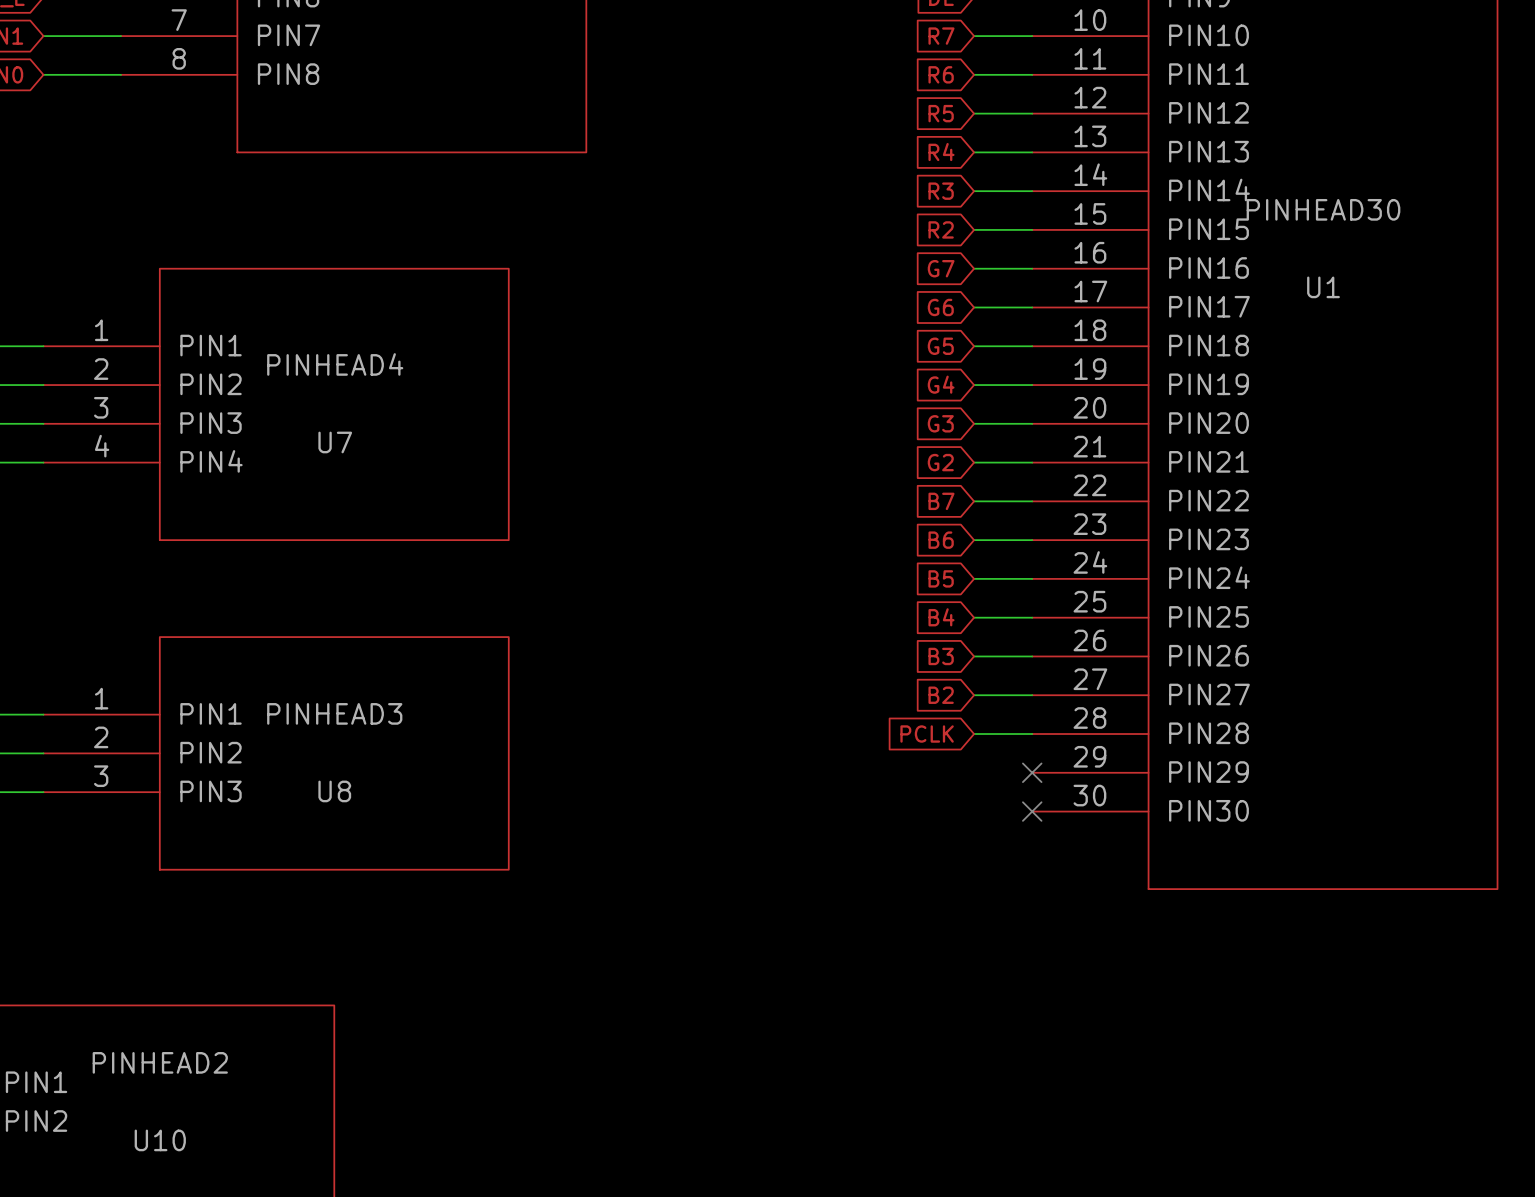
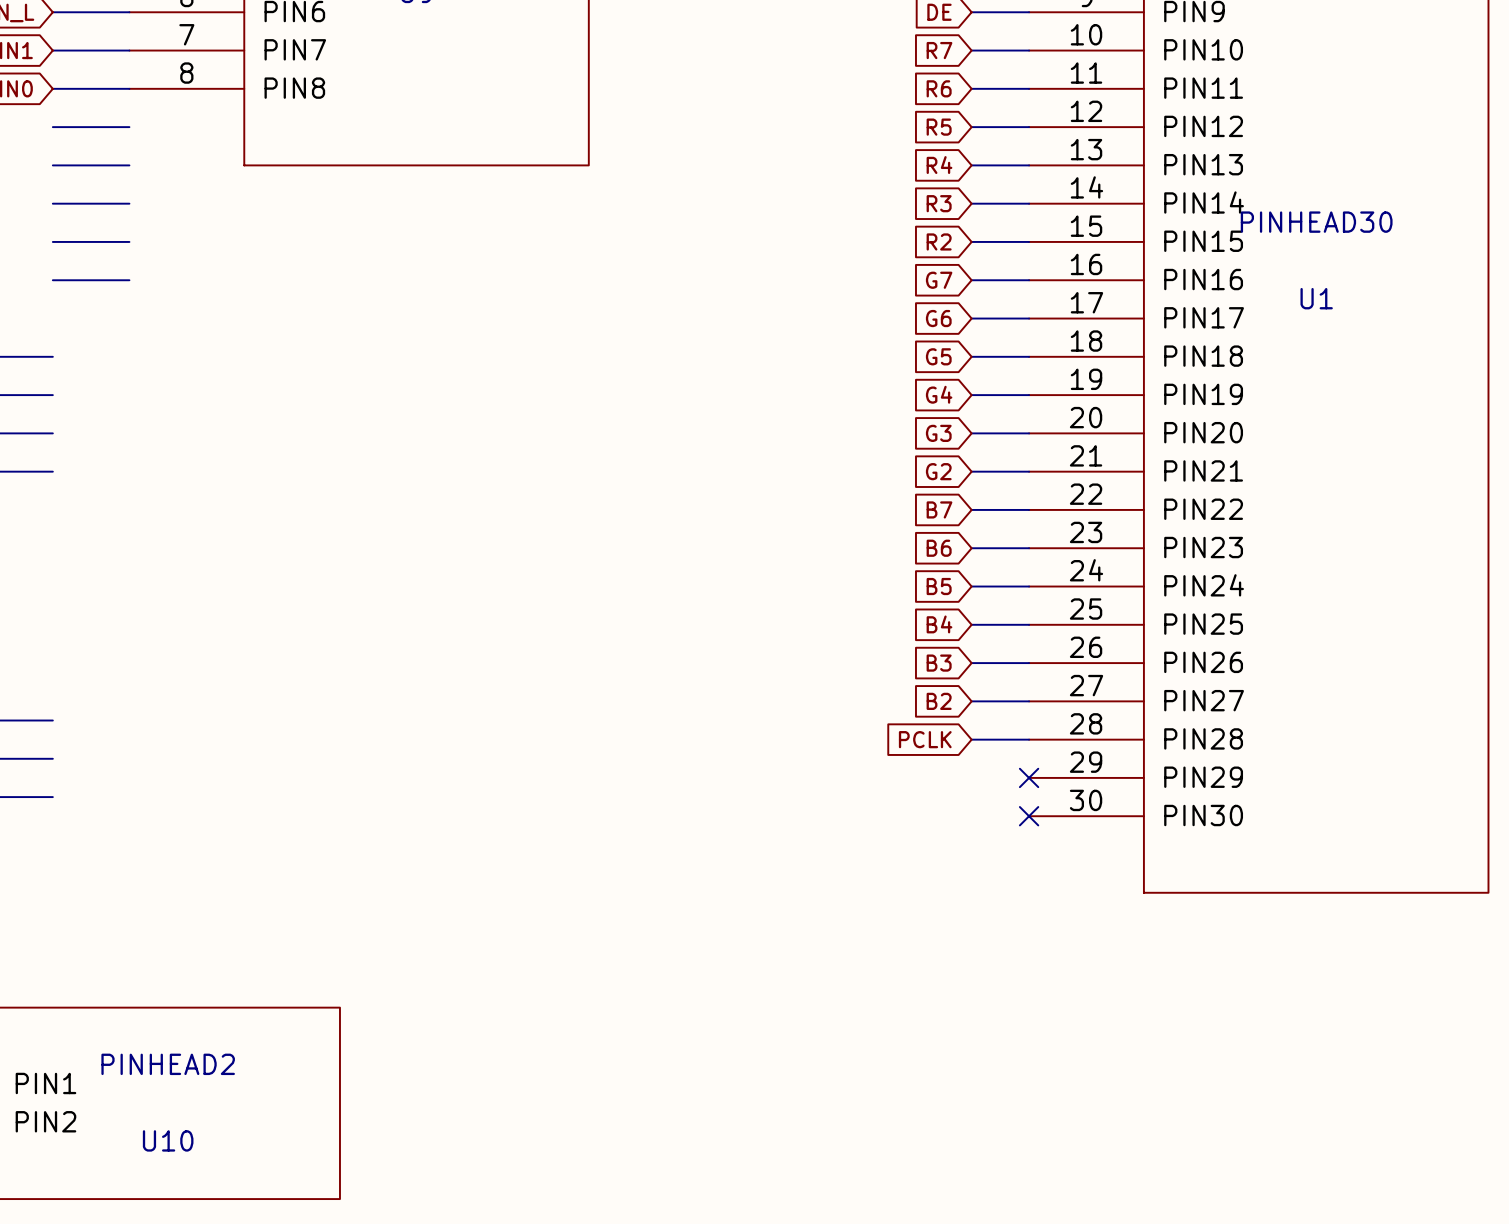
wire: none -> (52, 127) (129, 127)
wire: none -> (52, 165) (129, 165)
wire: none -> (52, 203) (129, 203)
wire: none -> (52, 241) (129, 241)
wire: none -> (52, 280) (129, 280)
U7: PINHEAD4 (276, 404) -> none
U8: PINHEAD3 (276, 753) -> none

